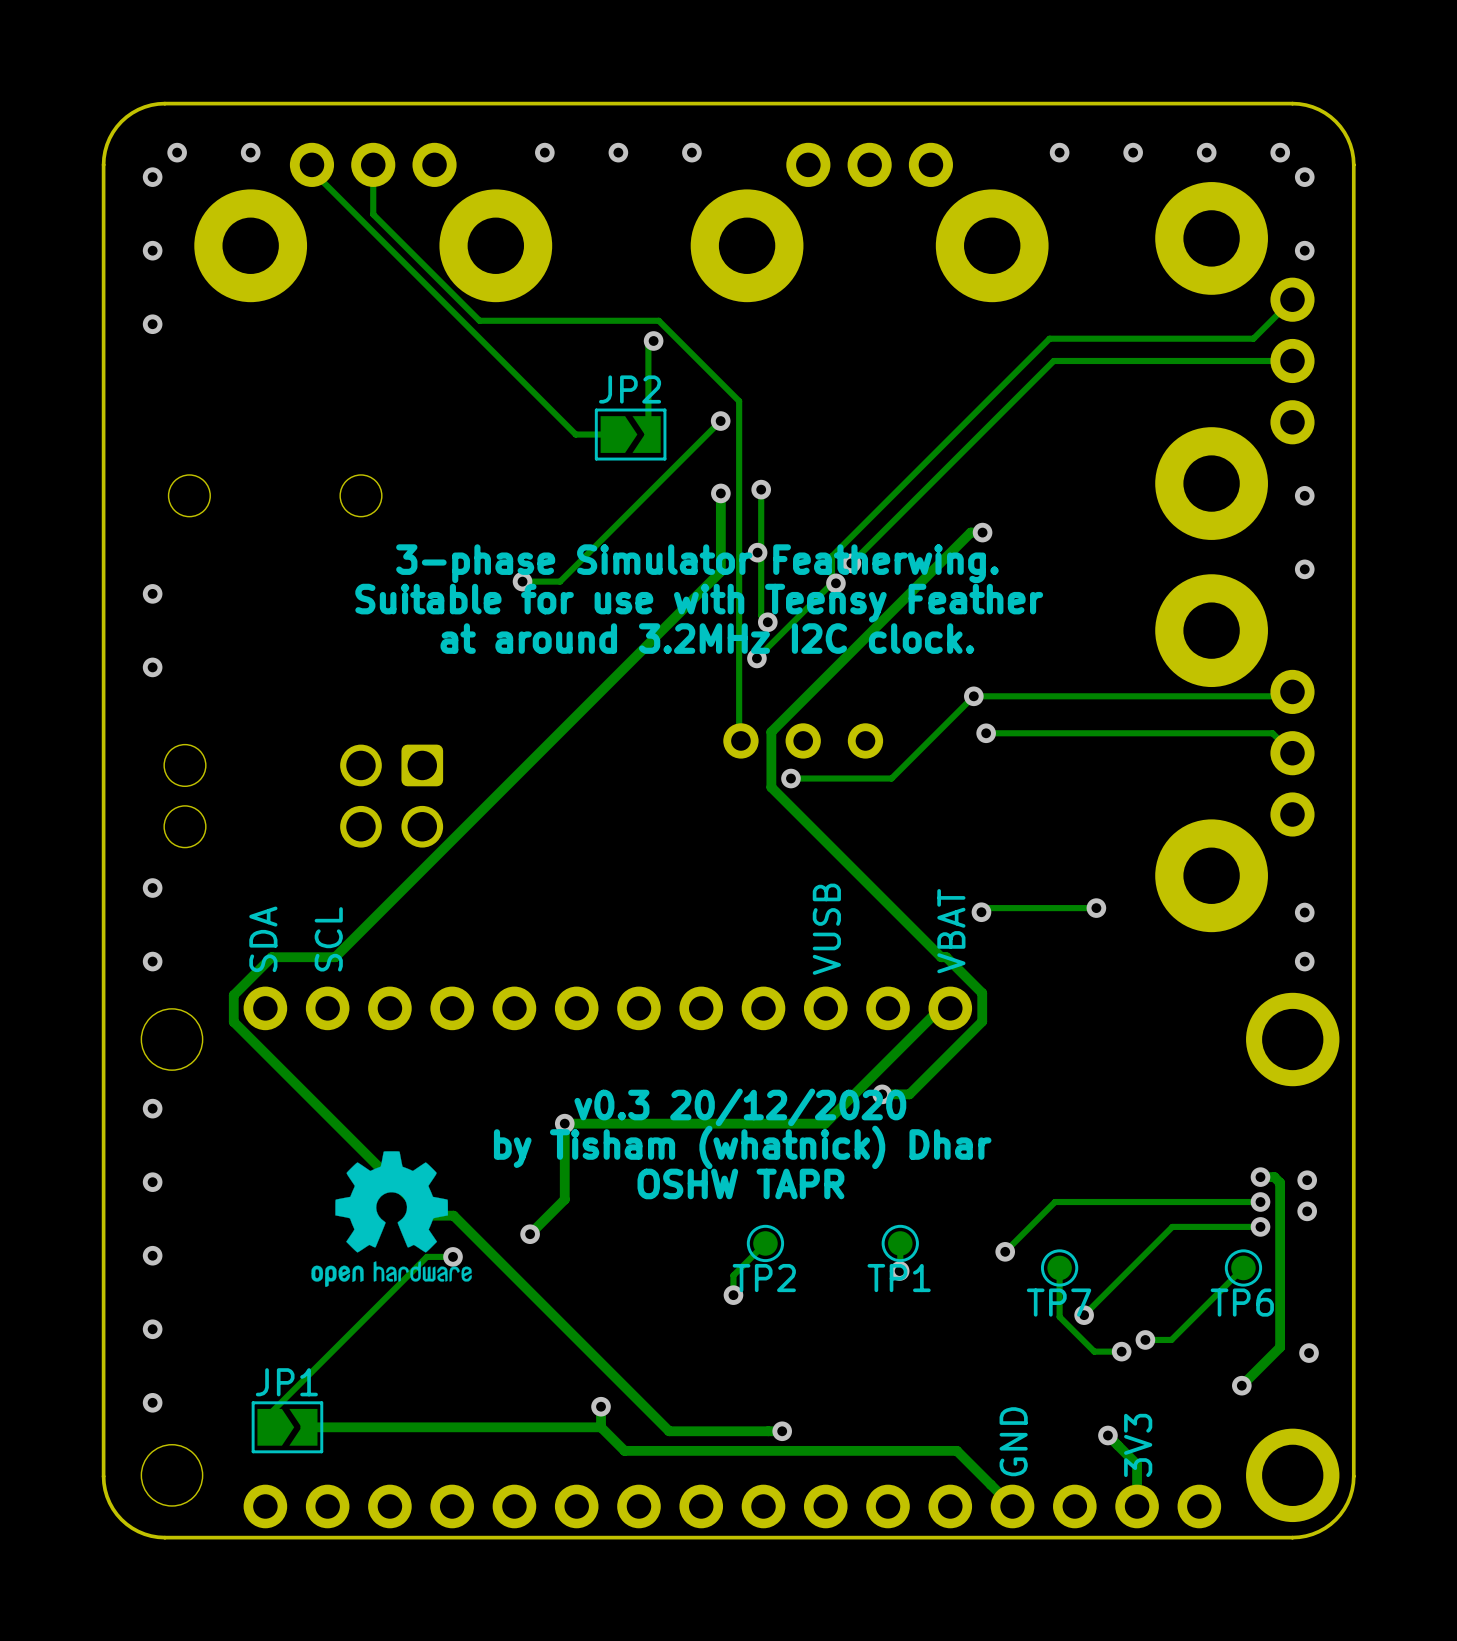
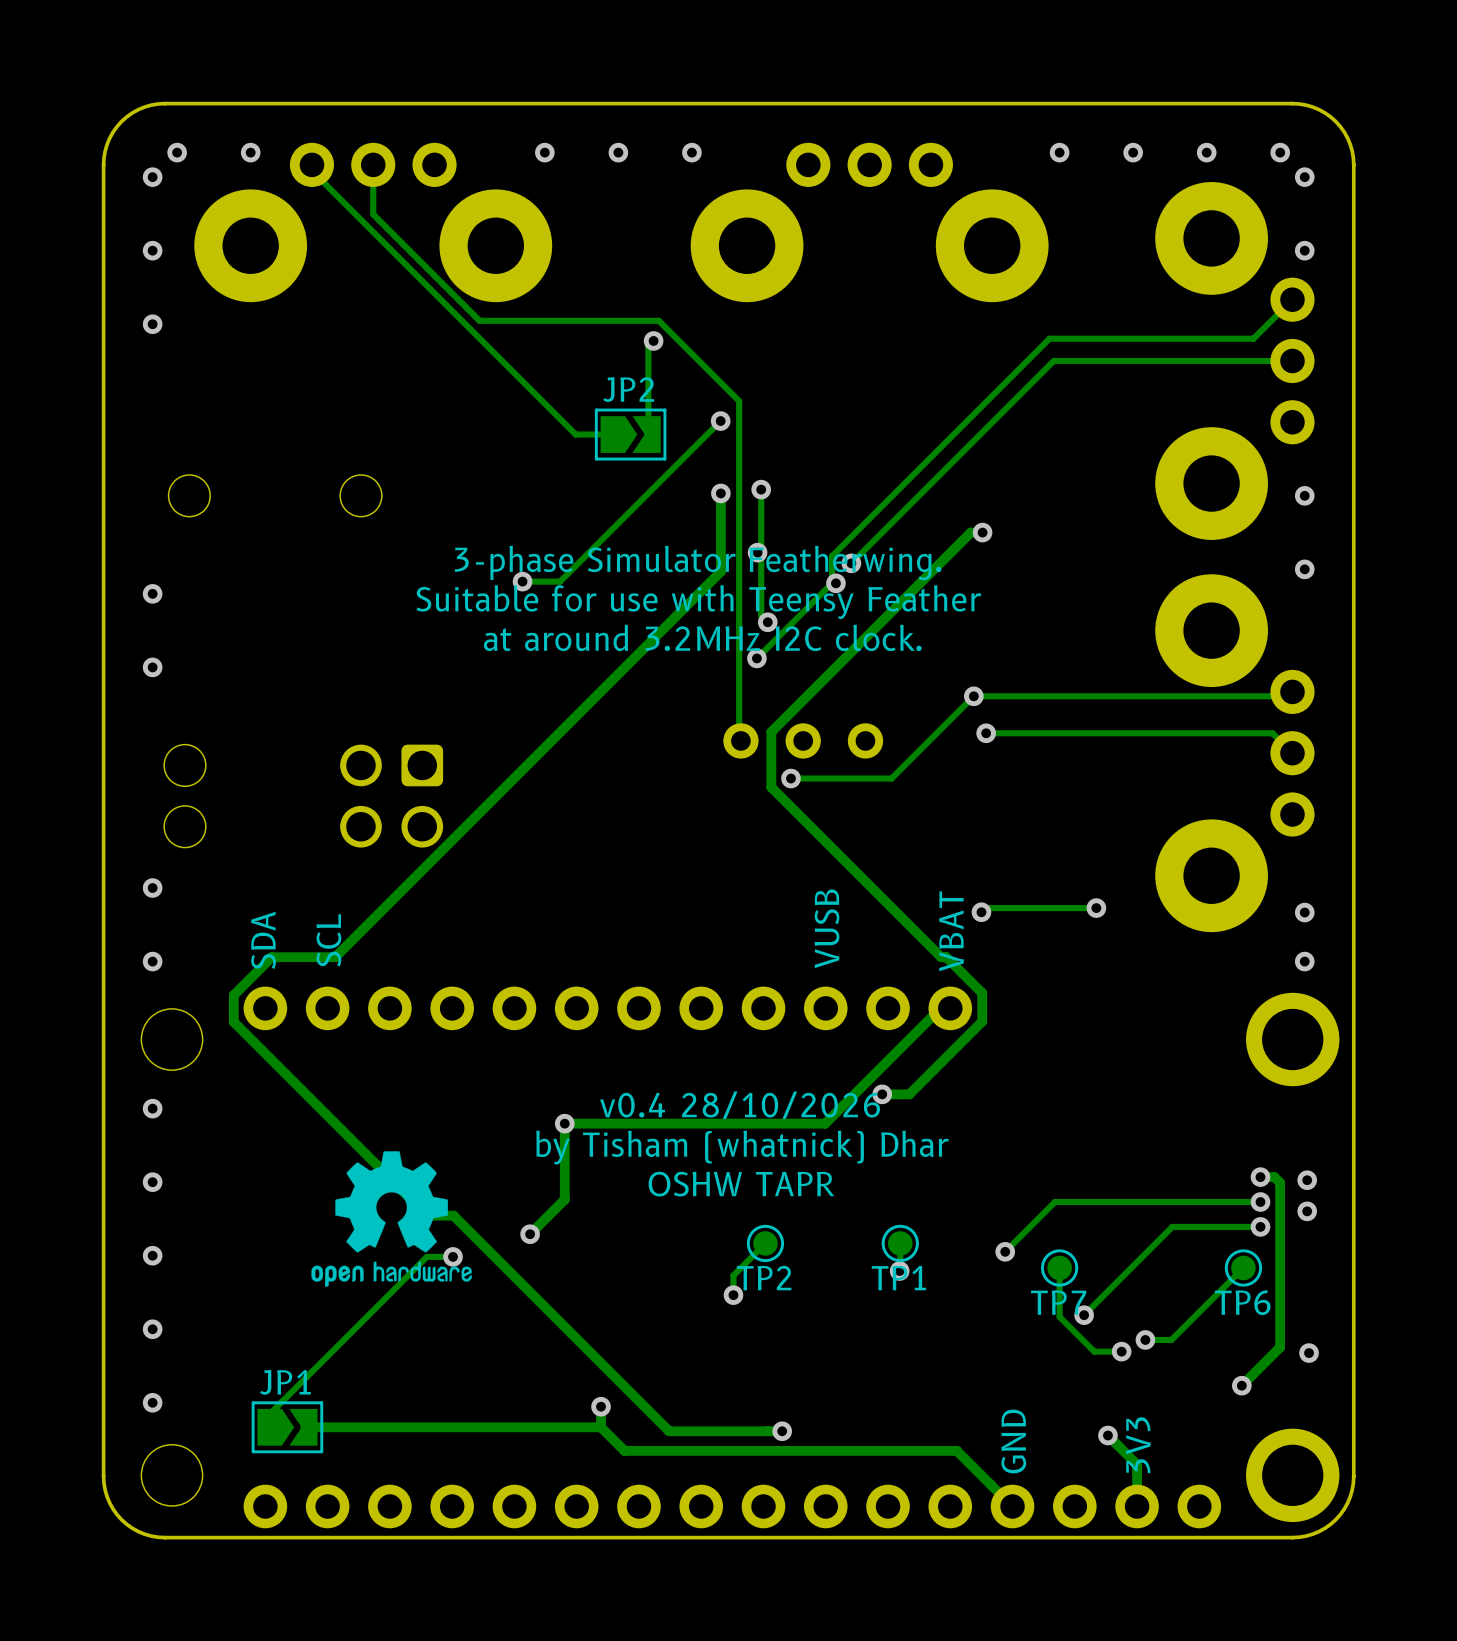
text: v0.3 20/12/2020 (740, 1107) -> v0.4 28/10/2026 (740, 1105)

